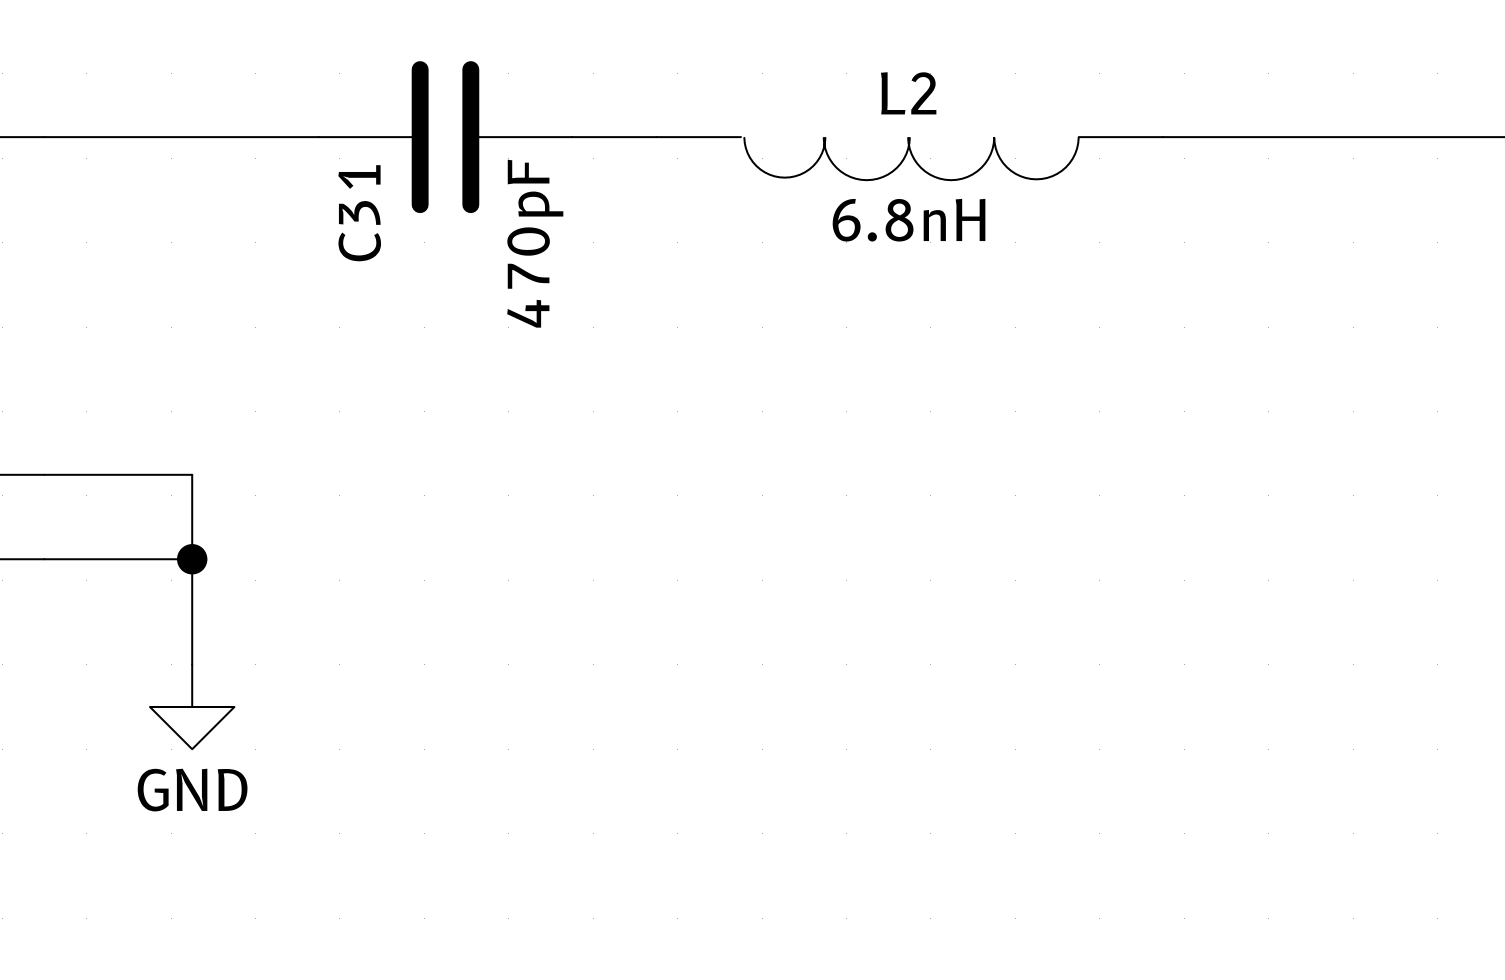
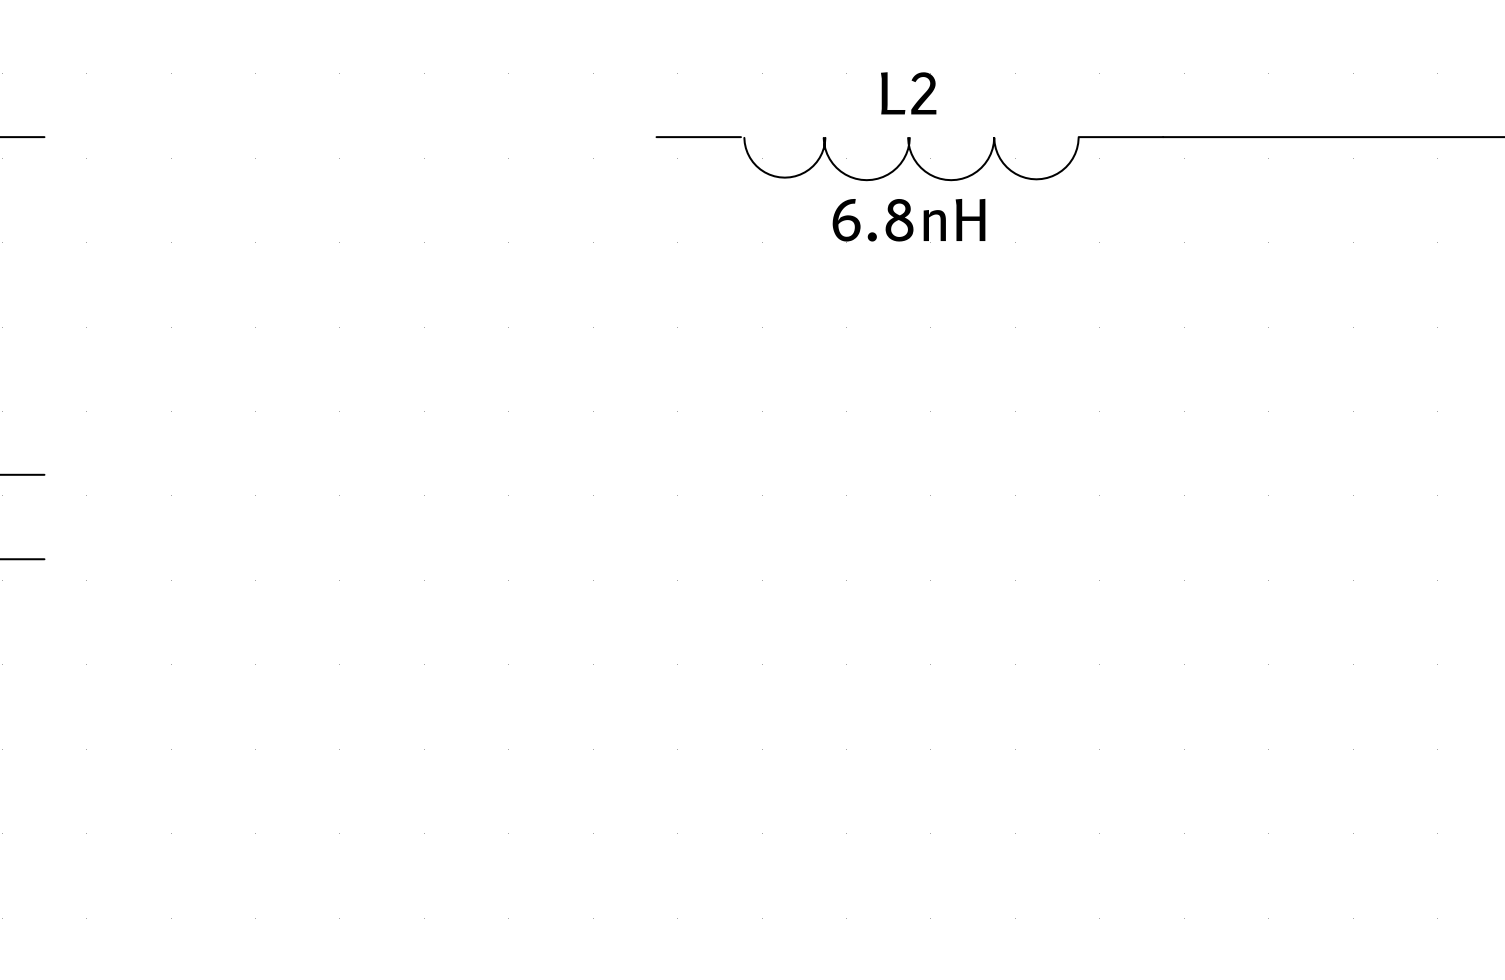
wire: (44, 137) (318, 137) -> none
C31: 470pF (445, 137) -> none
wire: (572, 137) (656, 137) -> none
wire: (44, 474) (192, 474) (192, 664) -> none
wire: (44, 559) (192, 559) -> none
junction: (192, 559) -> none
power symbol: GND (192, 706) -> none

